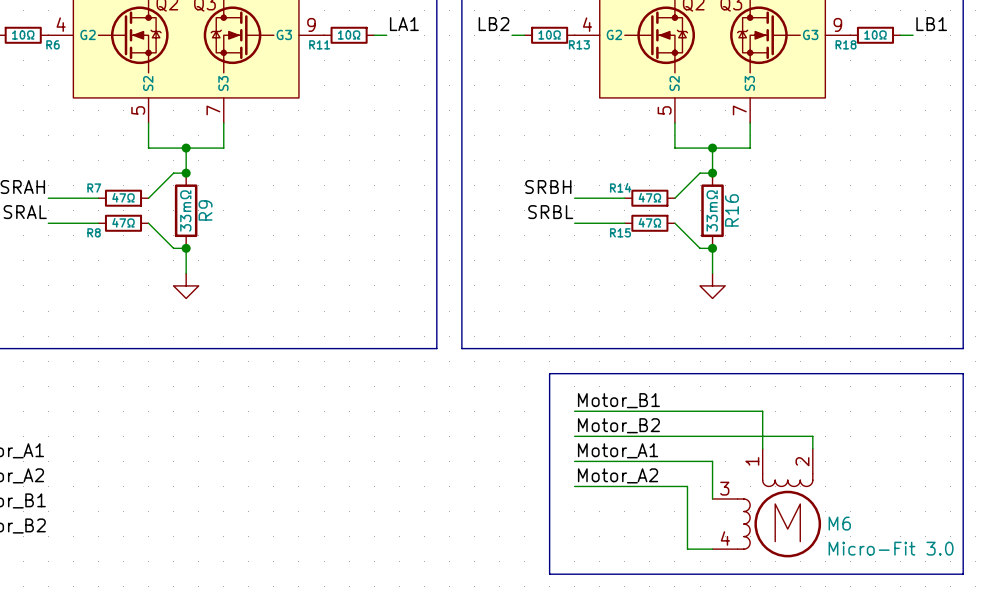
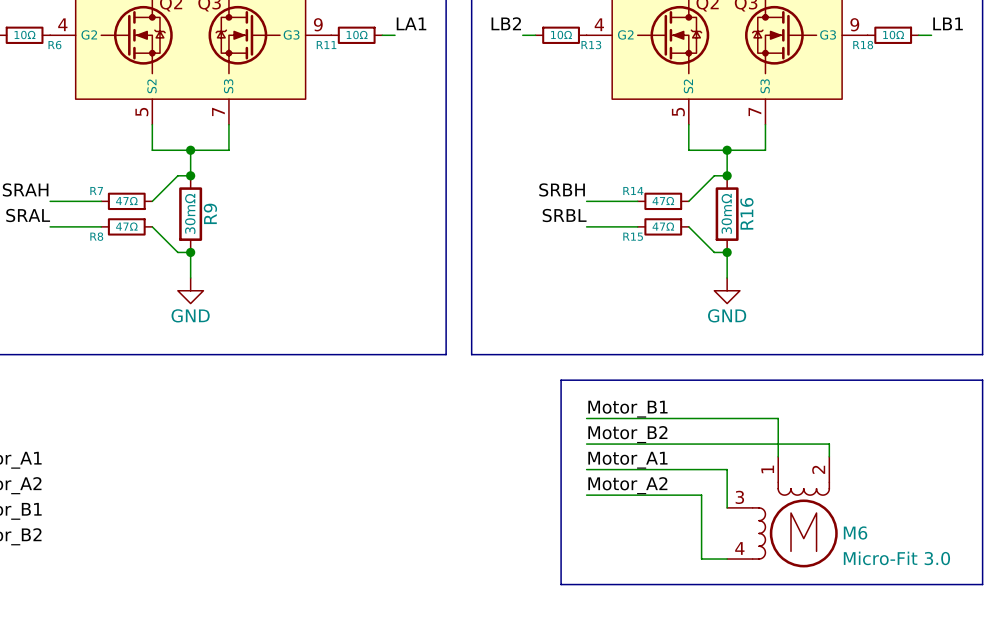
R9 value: 33mΩ (185, 210) -> 30mΩ (190, 213)
R16 value: 33mΩ (712, 210) -> 30mΩ (726, 213)
power symbol text: none -> GND (190, 315)
power symbol text: none -> GND (727, 315)

